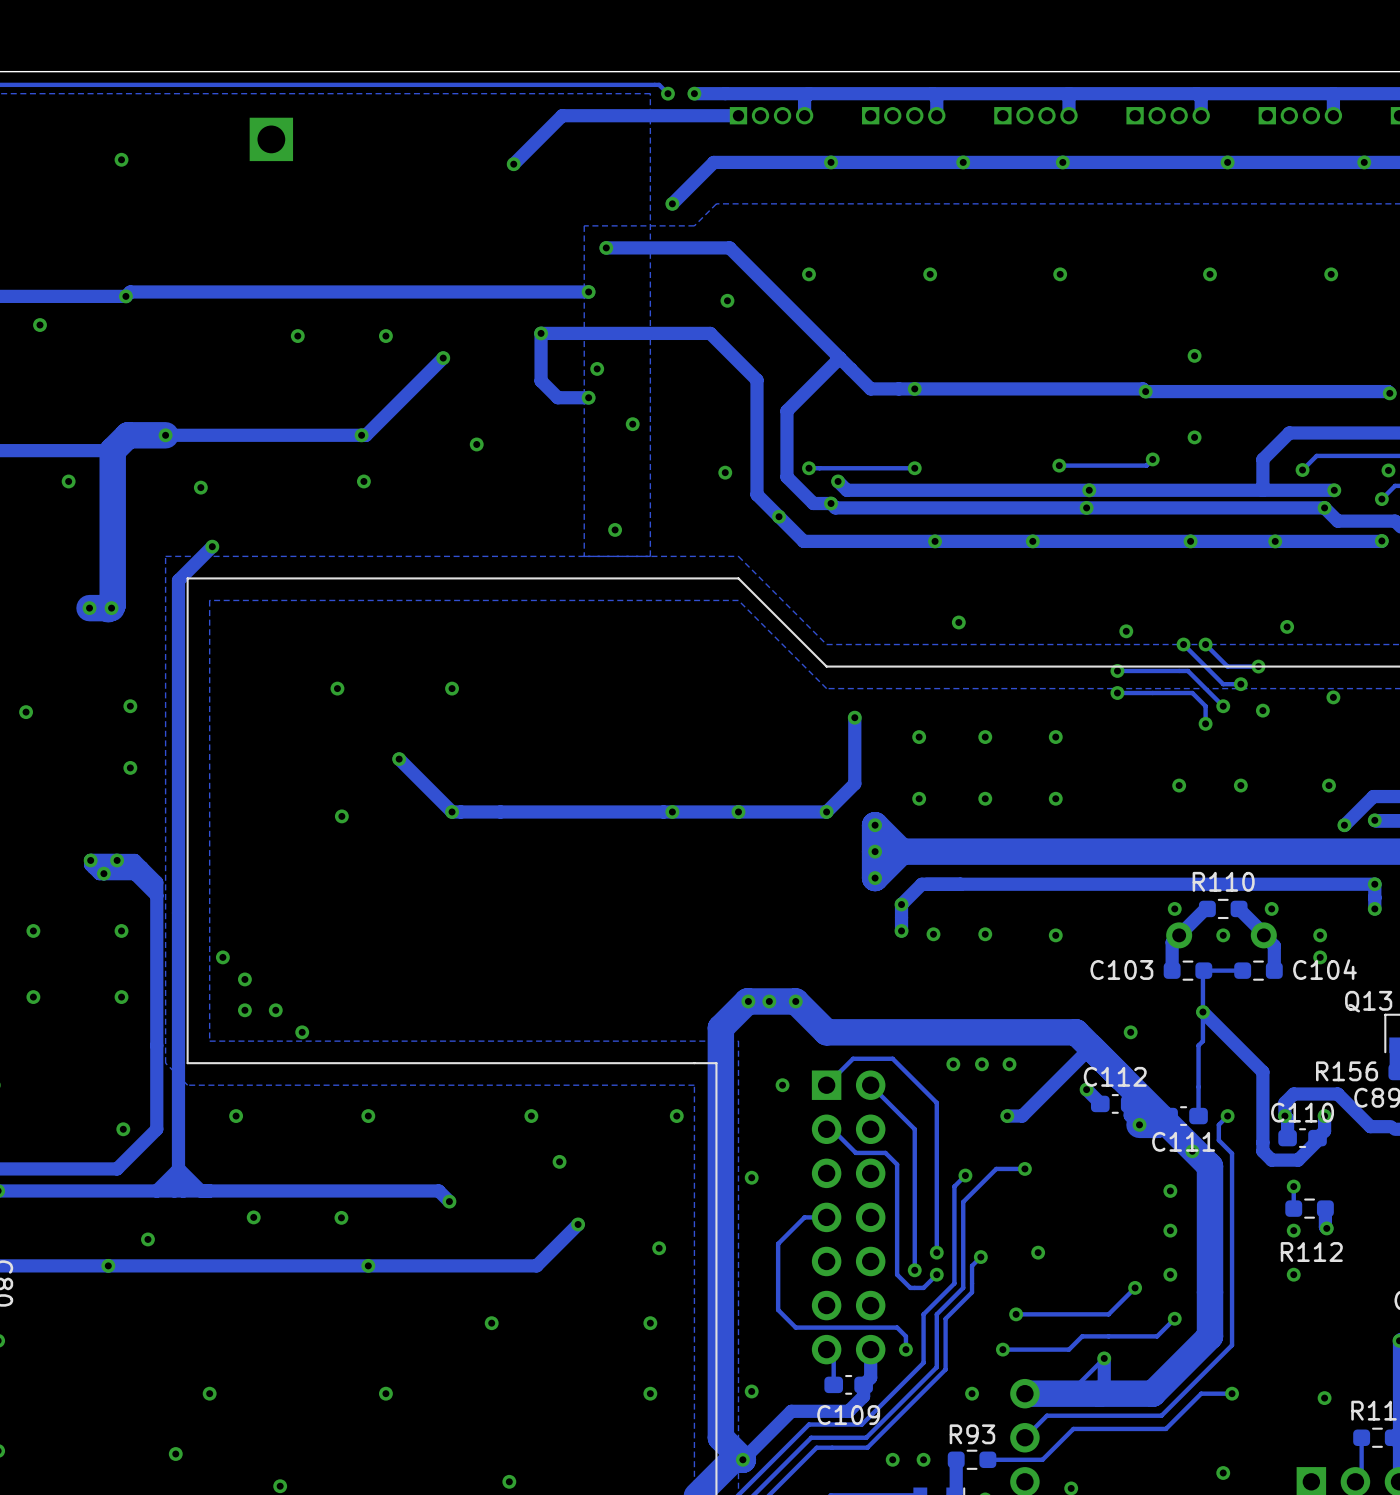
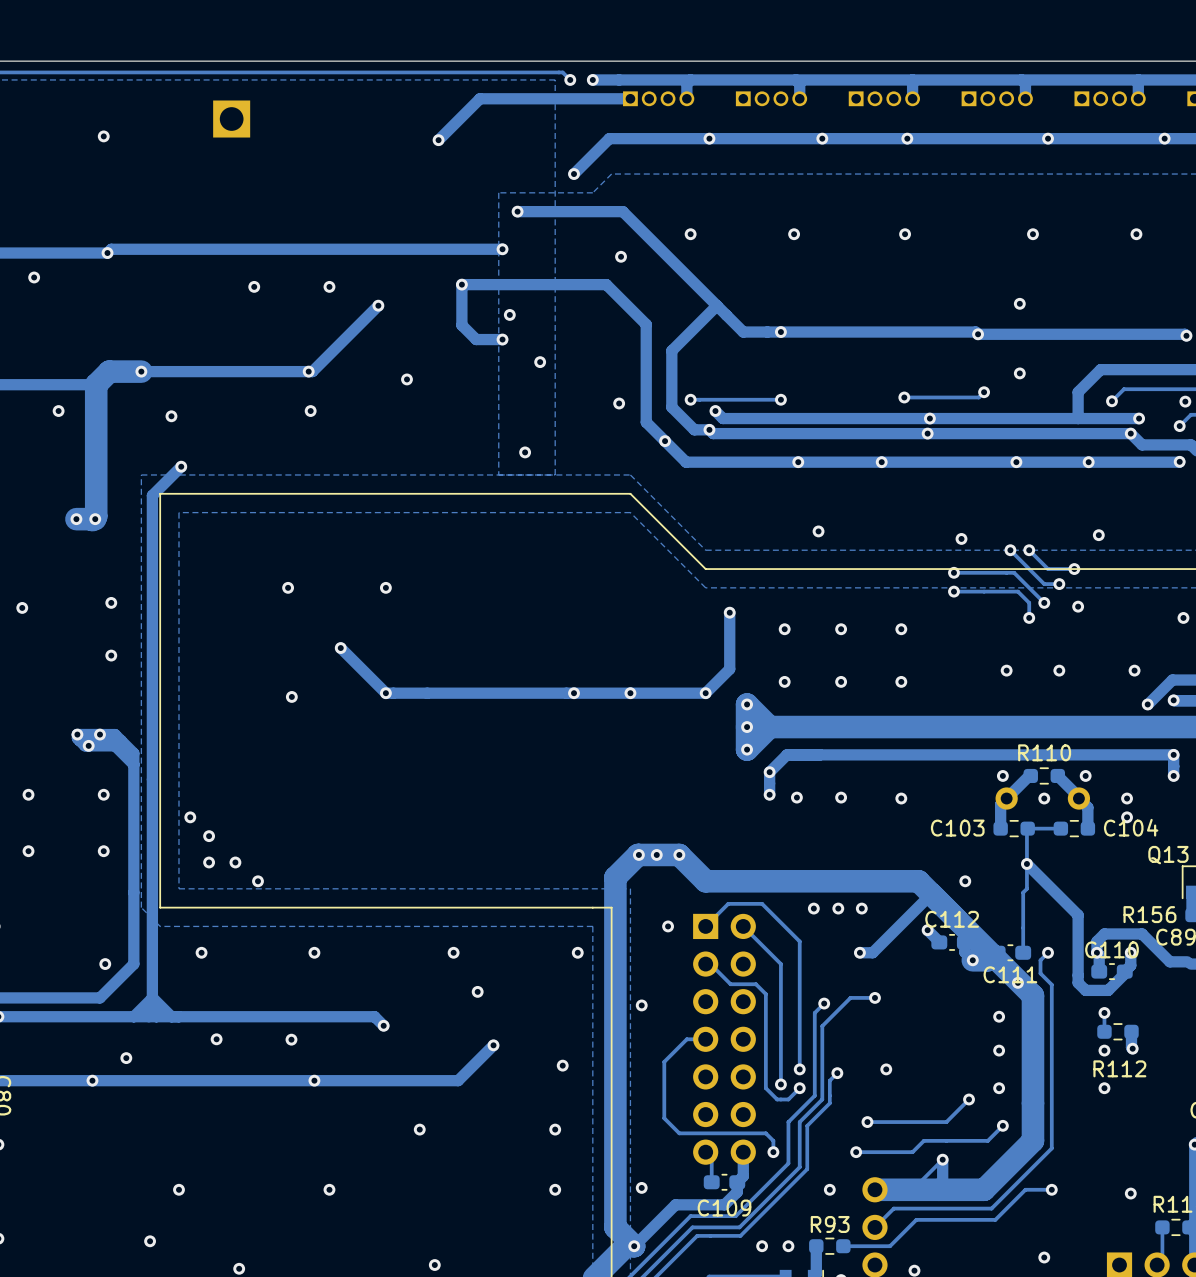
via position: (1333, 697) -> (1183, 617)

